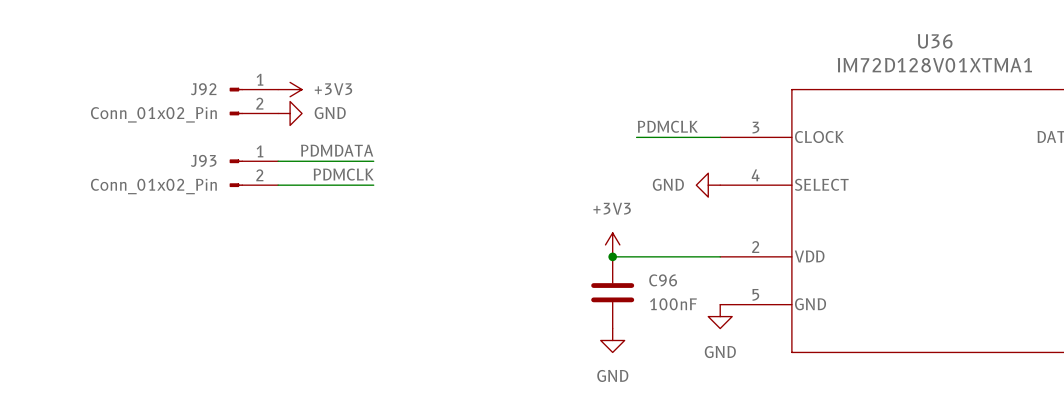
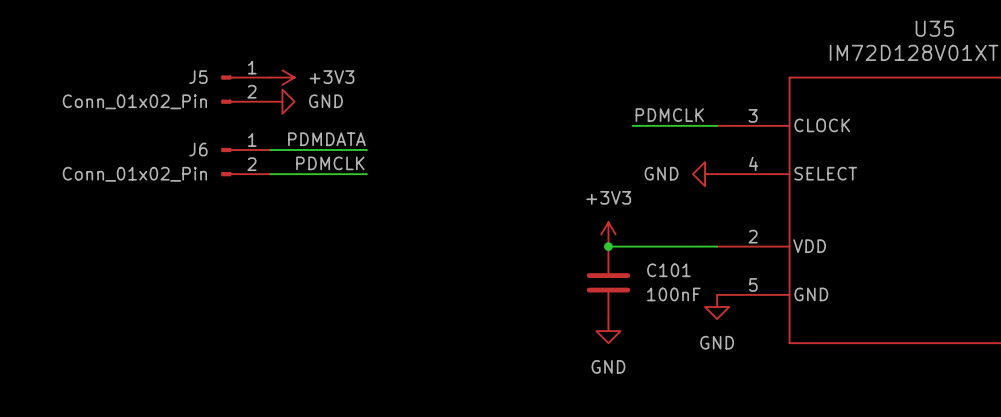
U36 name: U36 (935, 41) -> U35 (934, 28)
J92 name: J92 (203, 89) -> J5 (198, 77)
J93 name: J93 (203, 160) -> J6 (198, 149)
C96 name: C96 (663, 280) -> C101 (668, 270)

